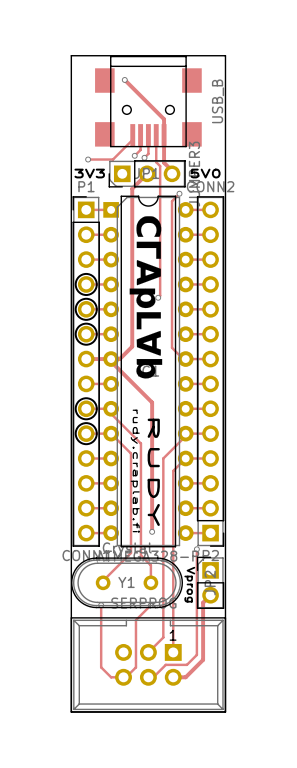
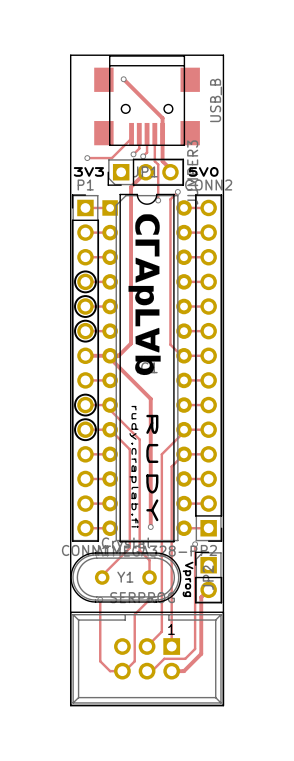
track: (156, 162) (160, 166) (160, 295) (158, 297) -> (154, 160) (158, 164) (158, 200)
via: none -> (158, 200)
via: (158, 297) -> none

